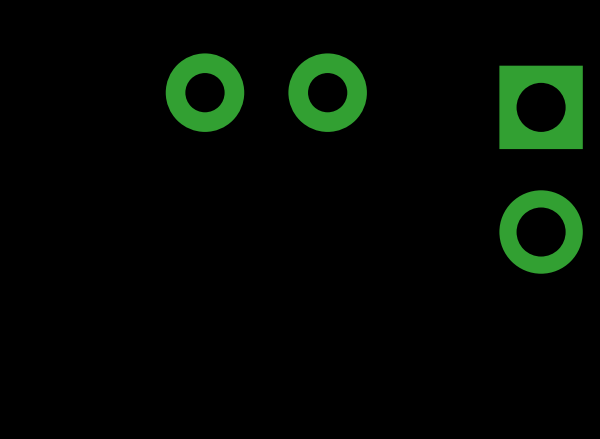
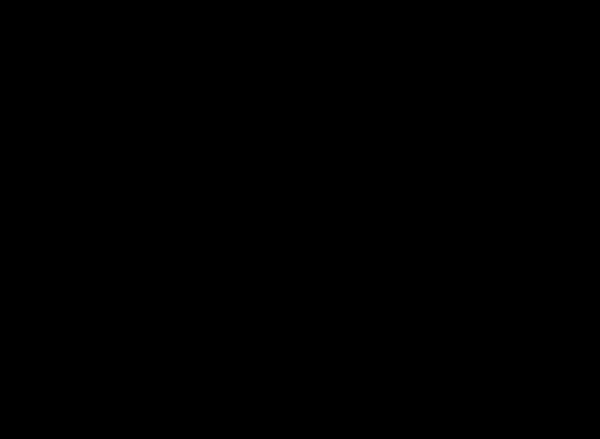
part: (266, 92) -> none
part: (541, 169) -> none

